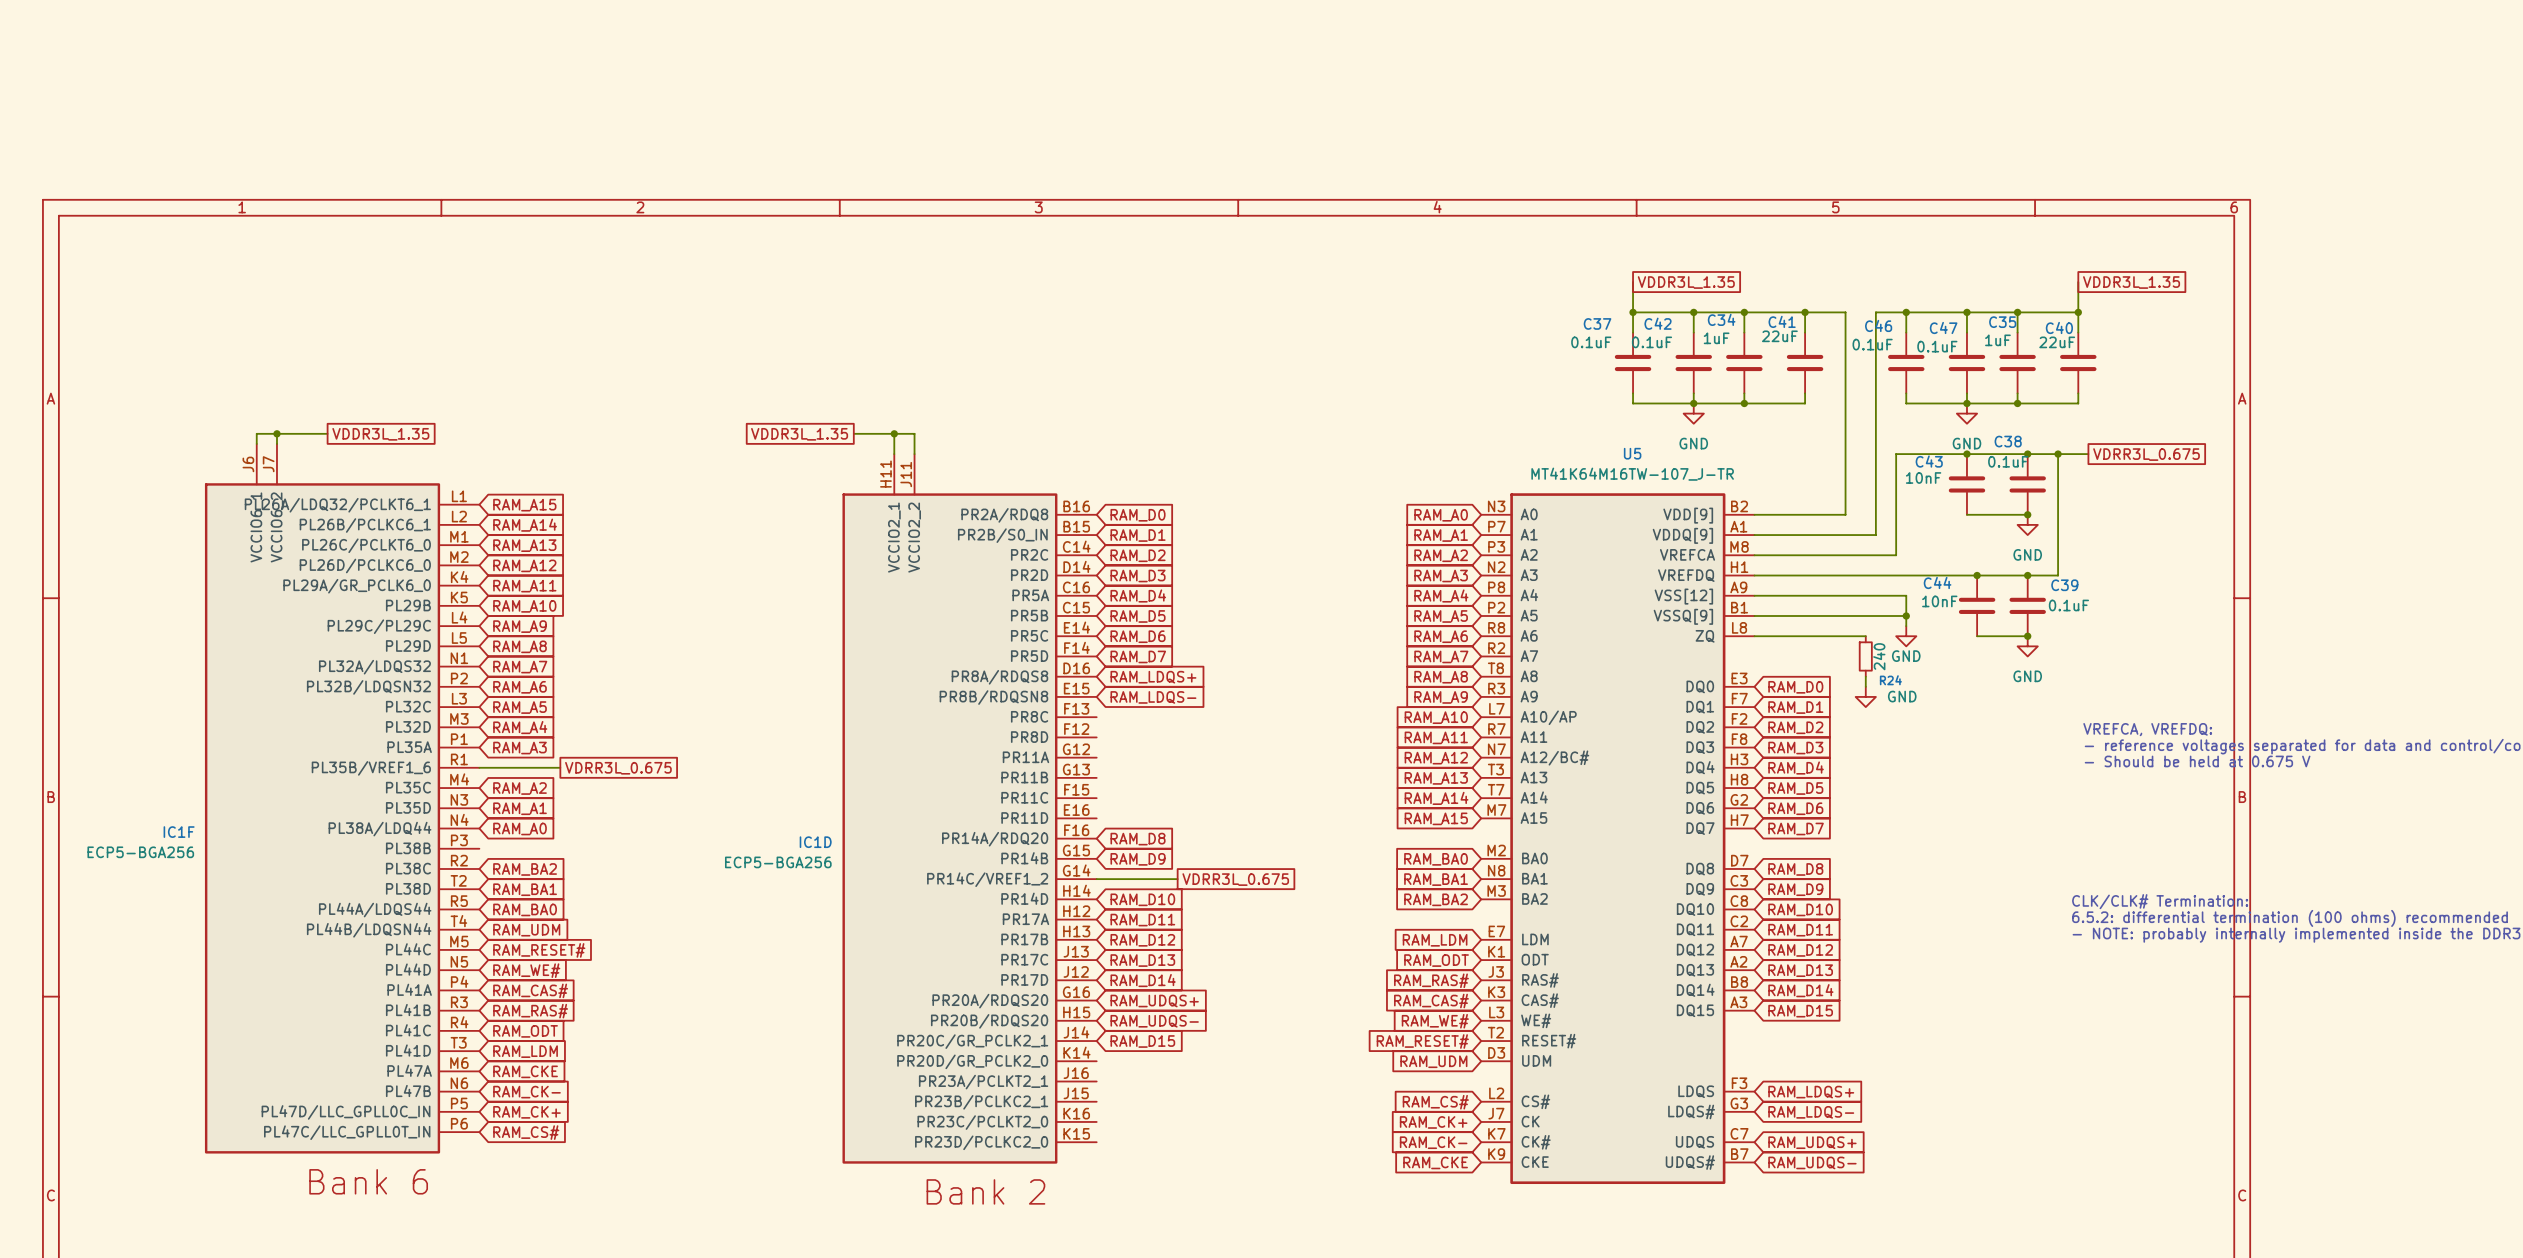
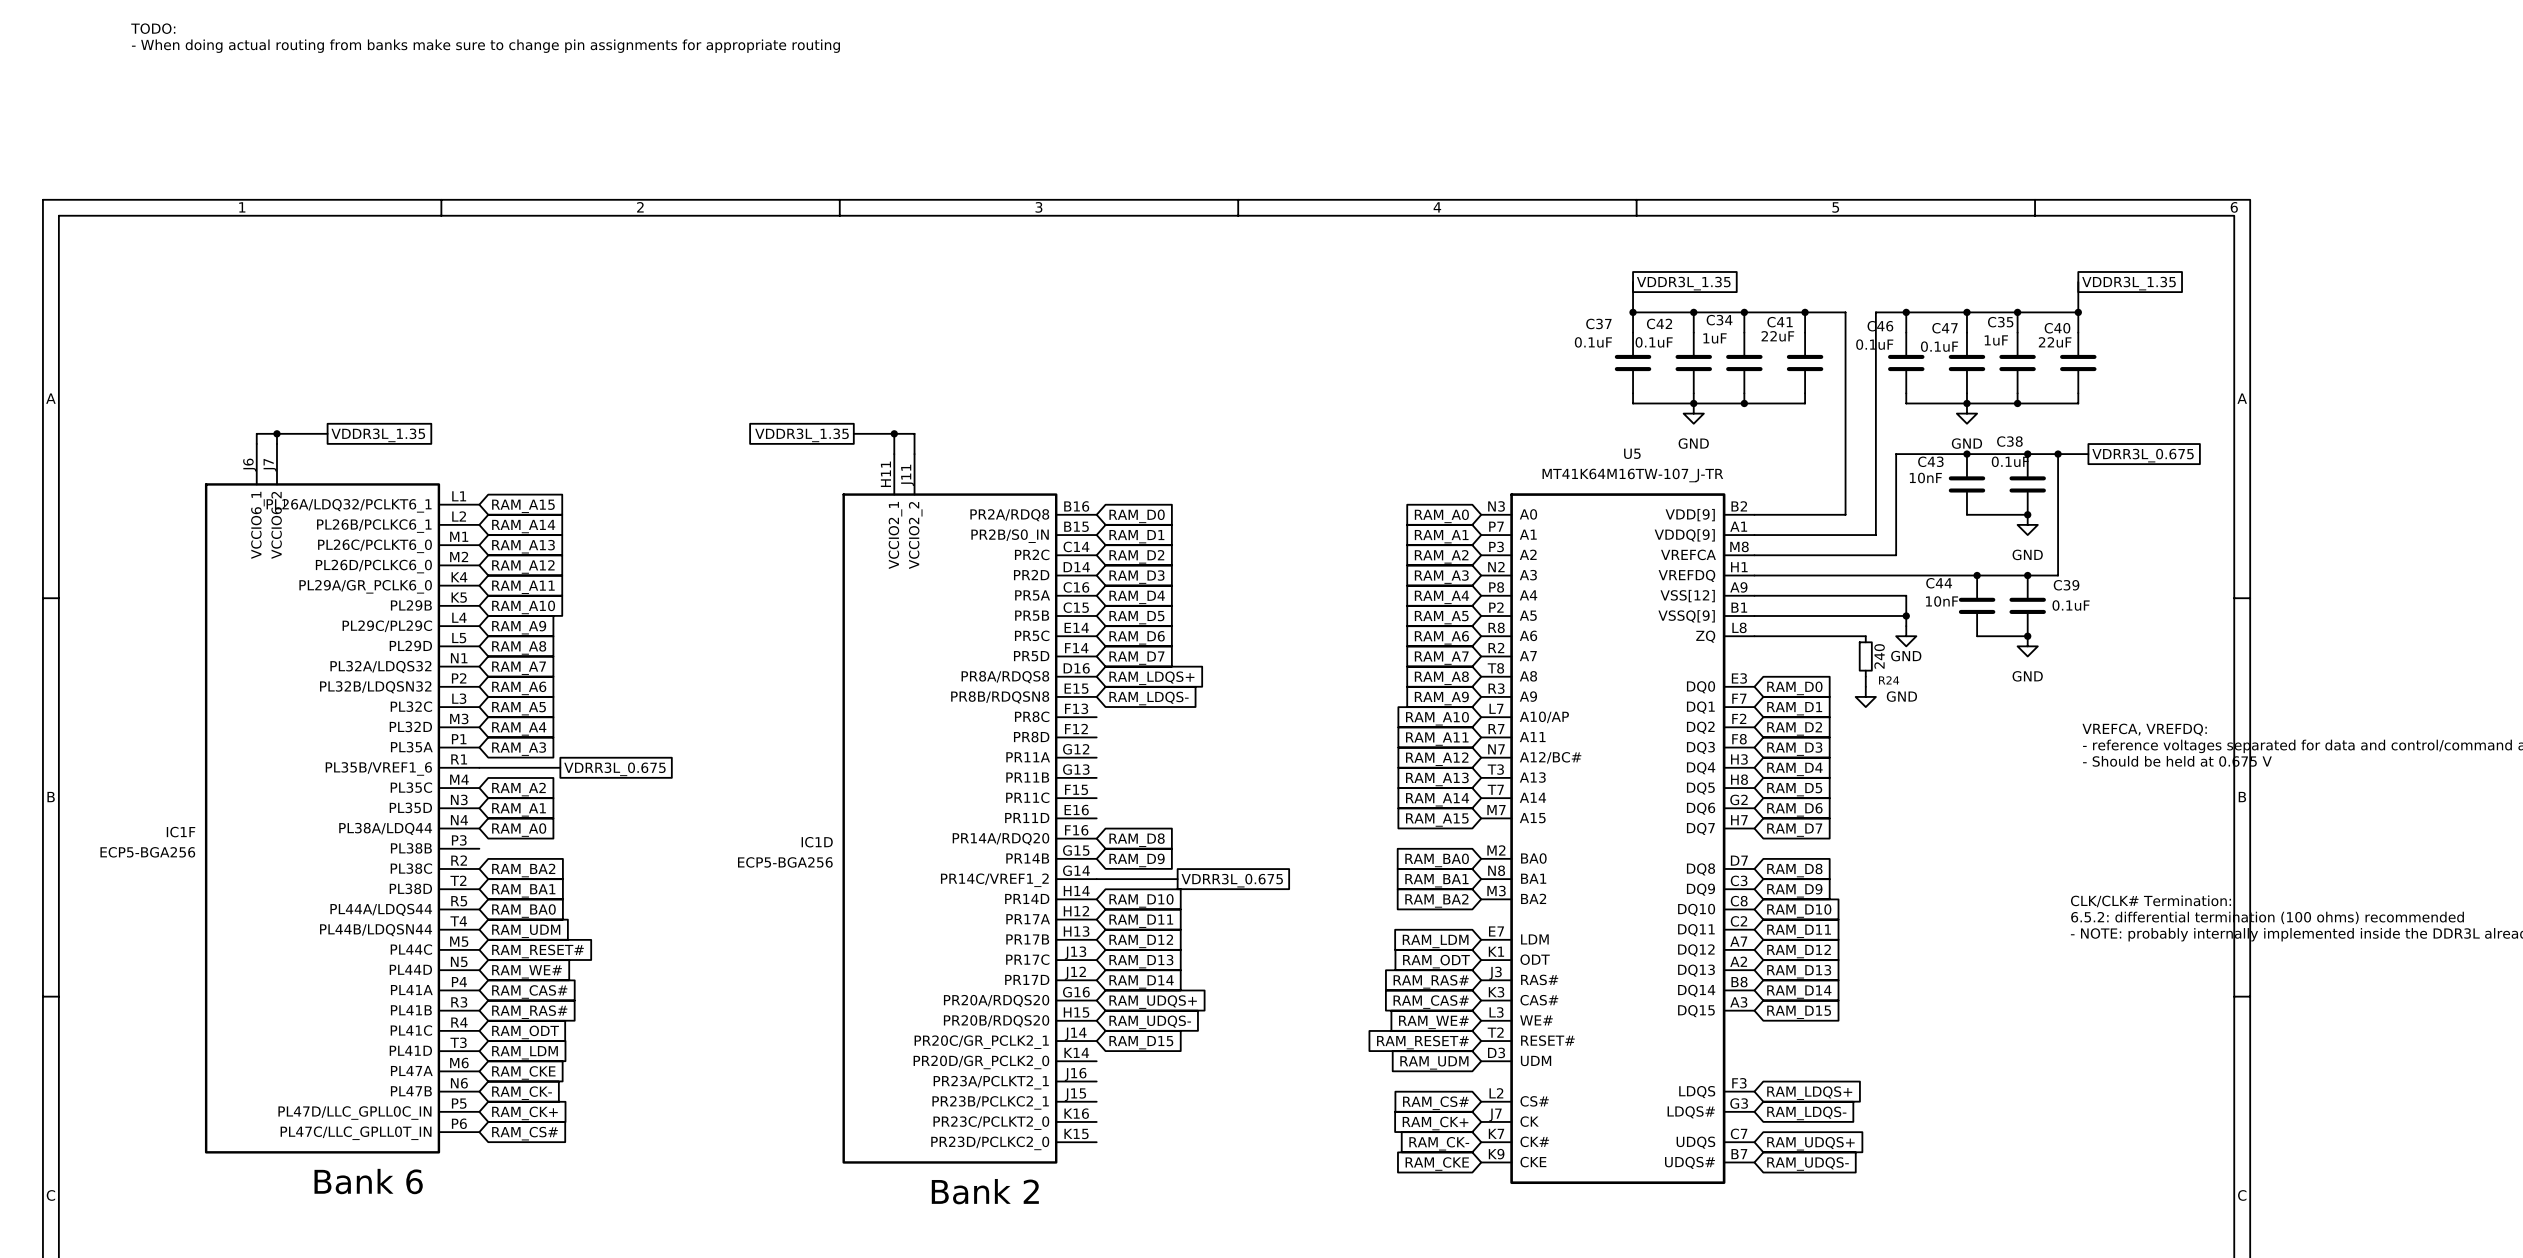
text: none -> TODO: (153, 28)
text: none -> - When doing actual routing from banks make sure to change pin assignments for appropriate routing (485, 46)

